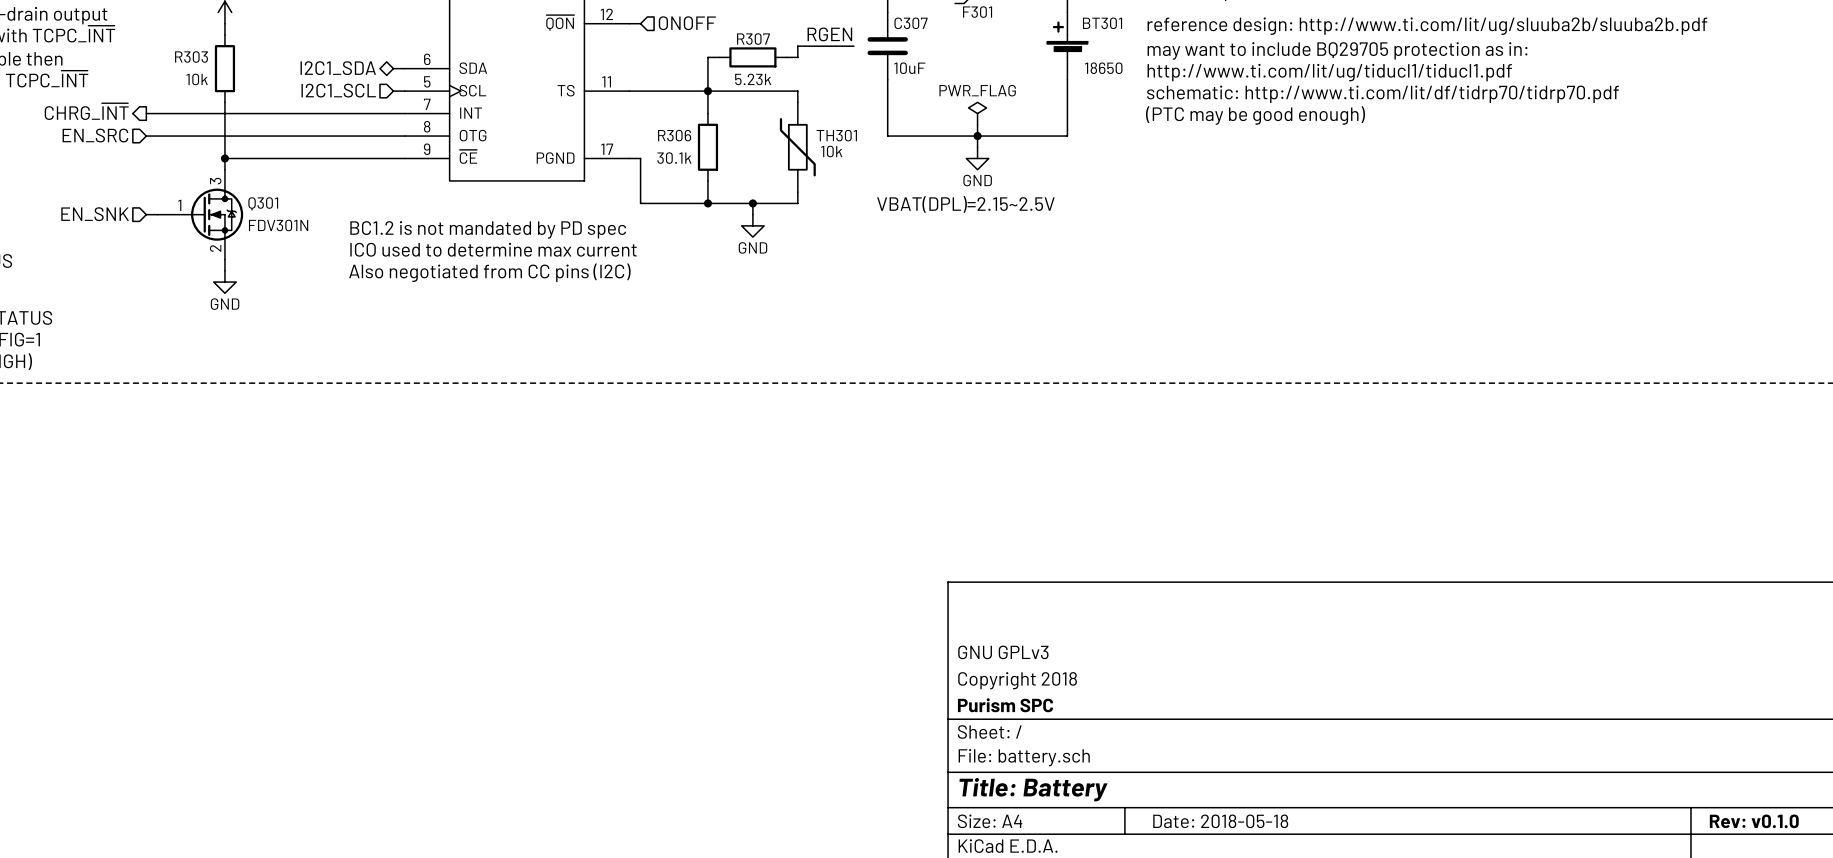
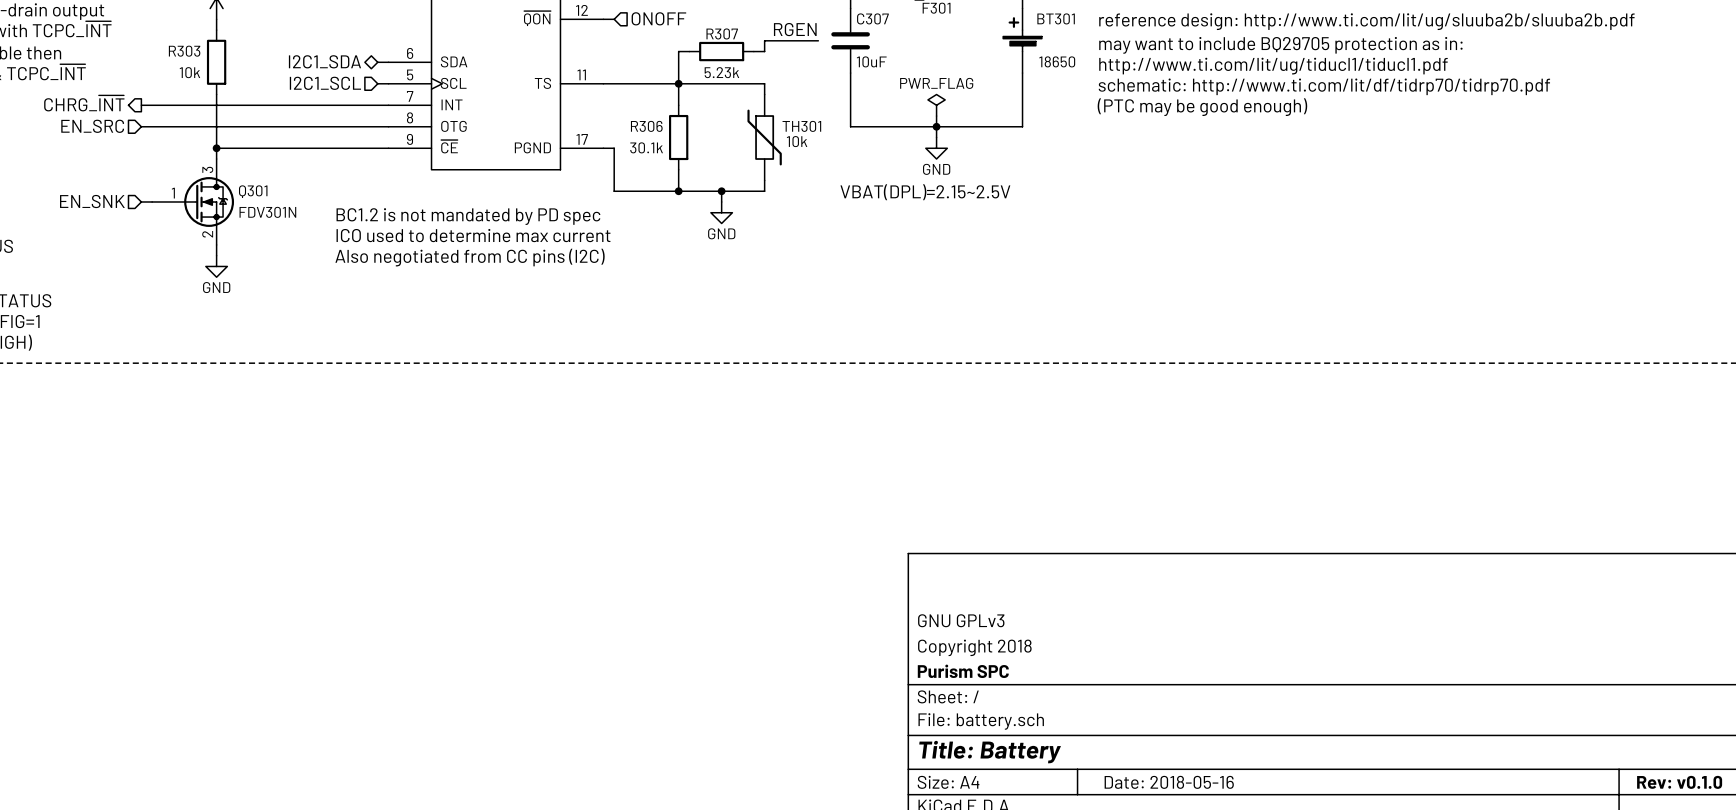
title block: Date: 2018-05-18 (1220, 821) -> Date: 2018-05-16 (1169, 782)

